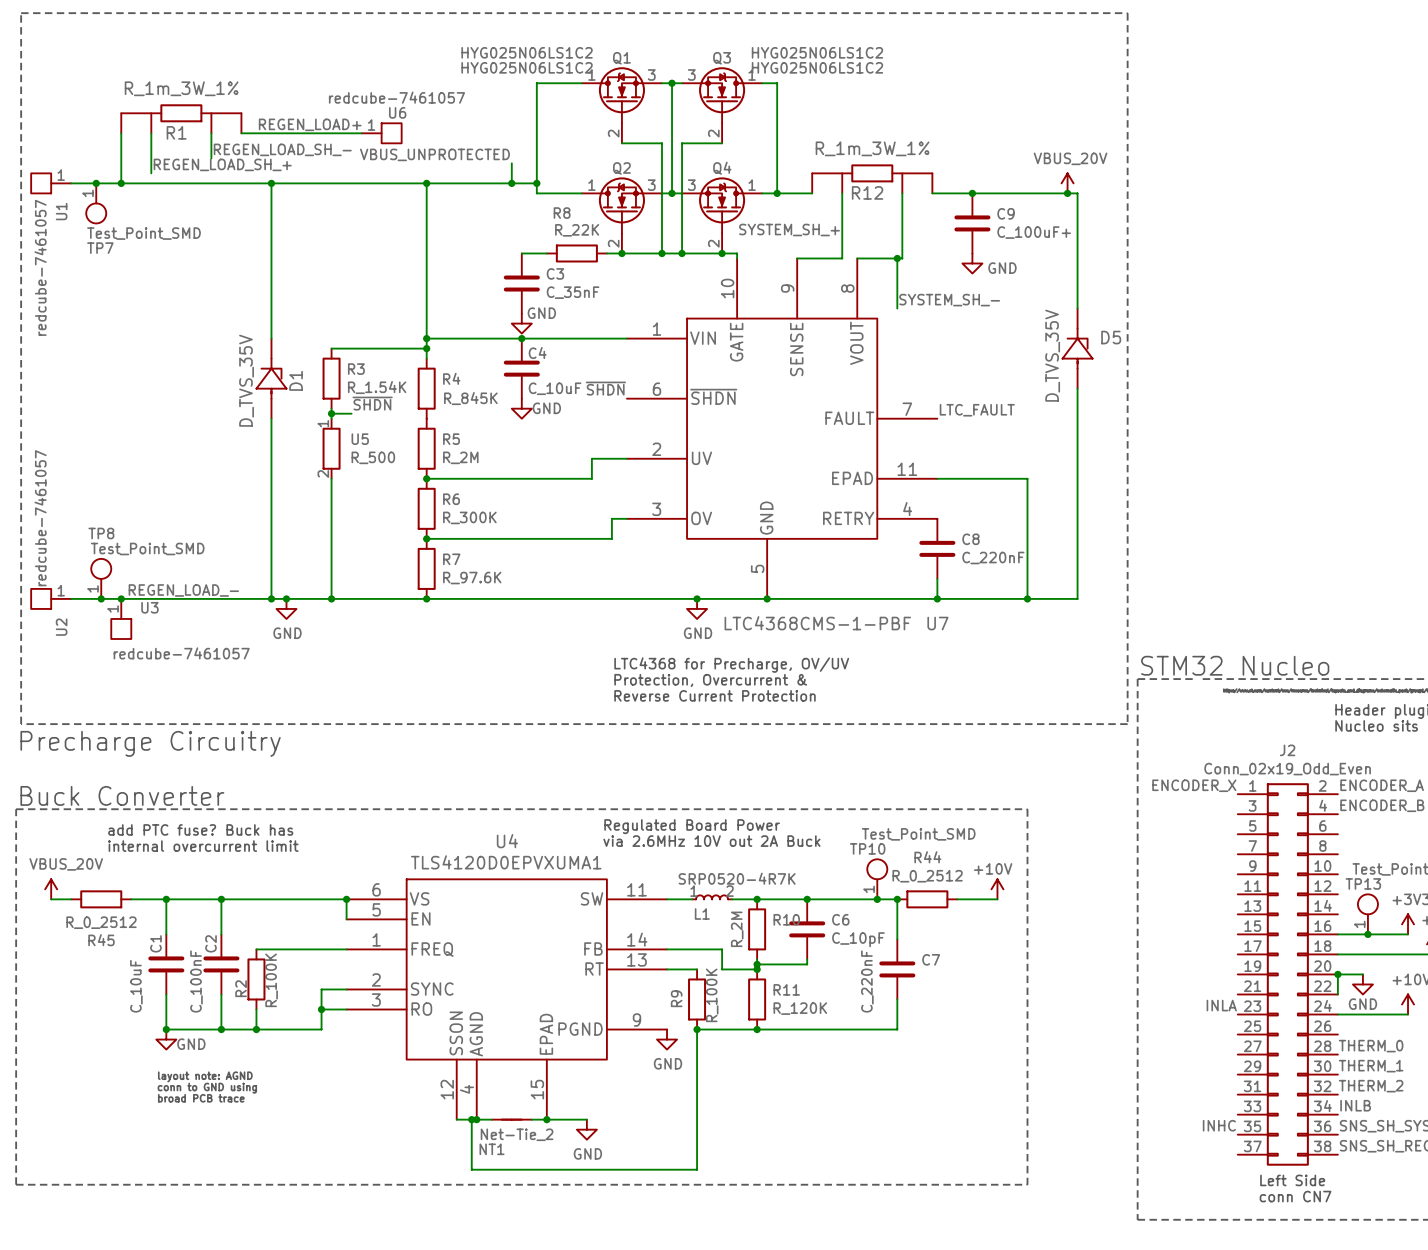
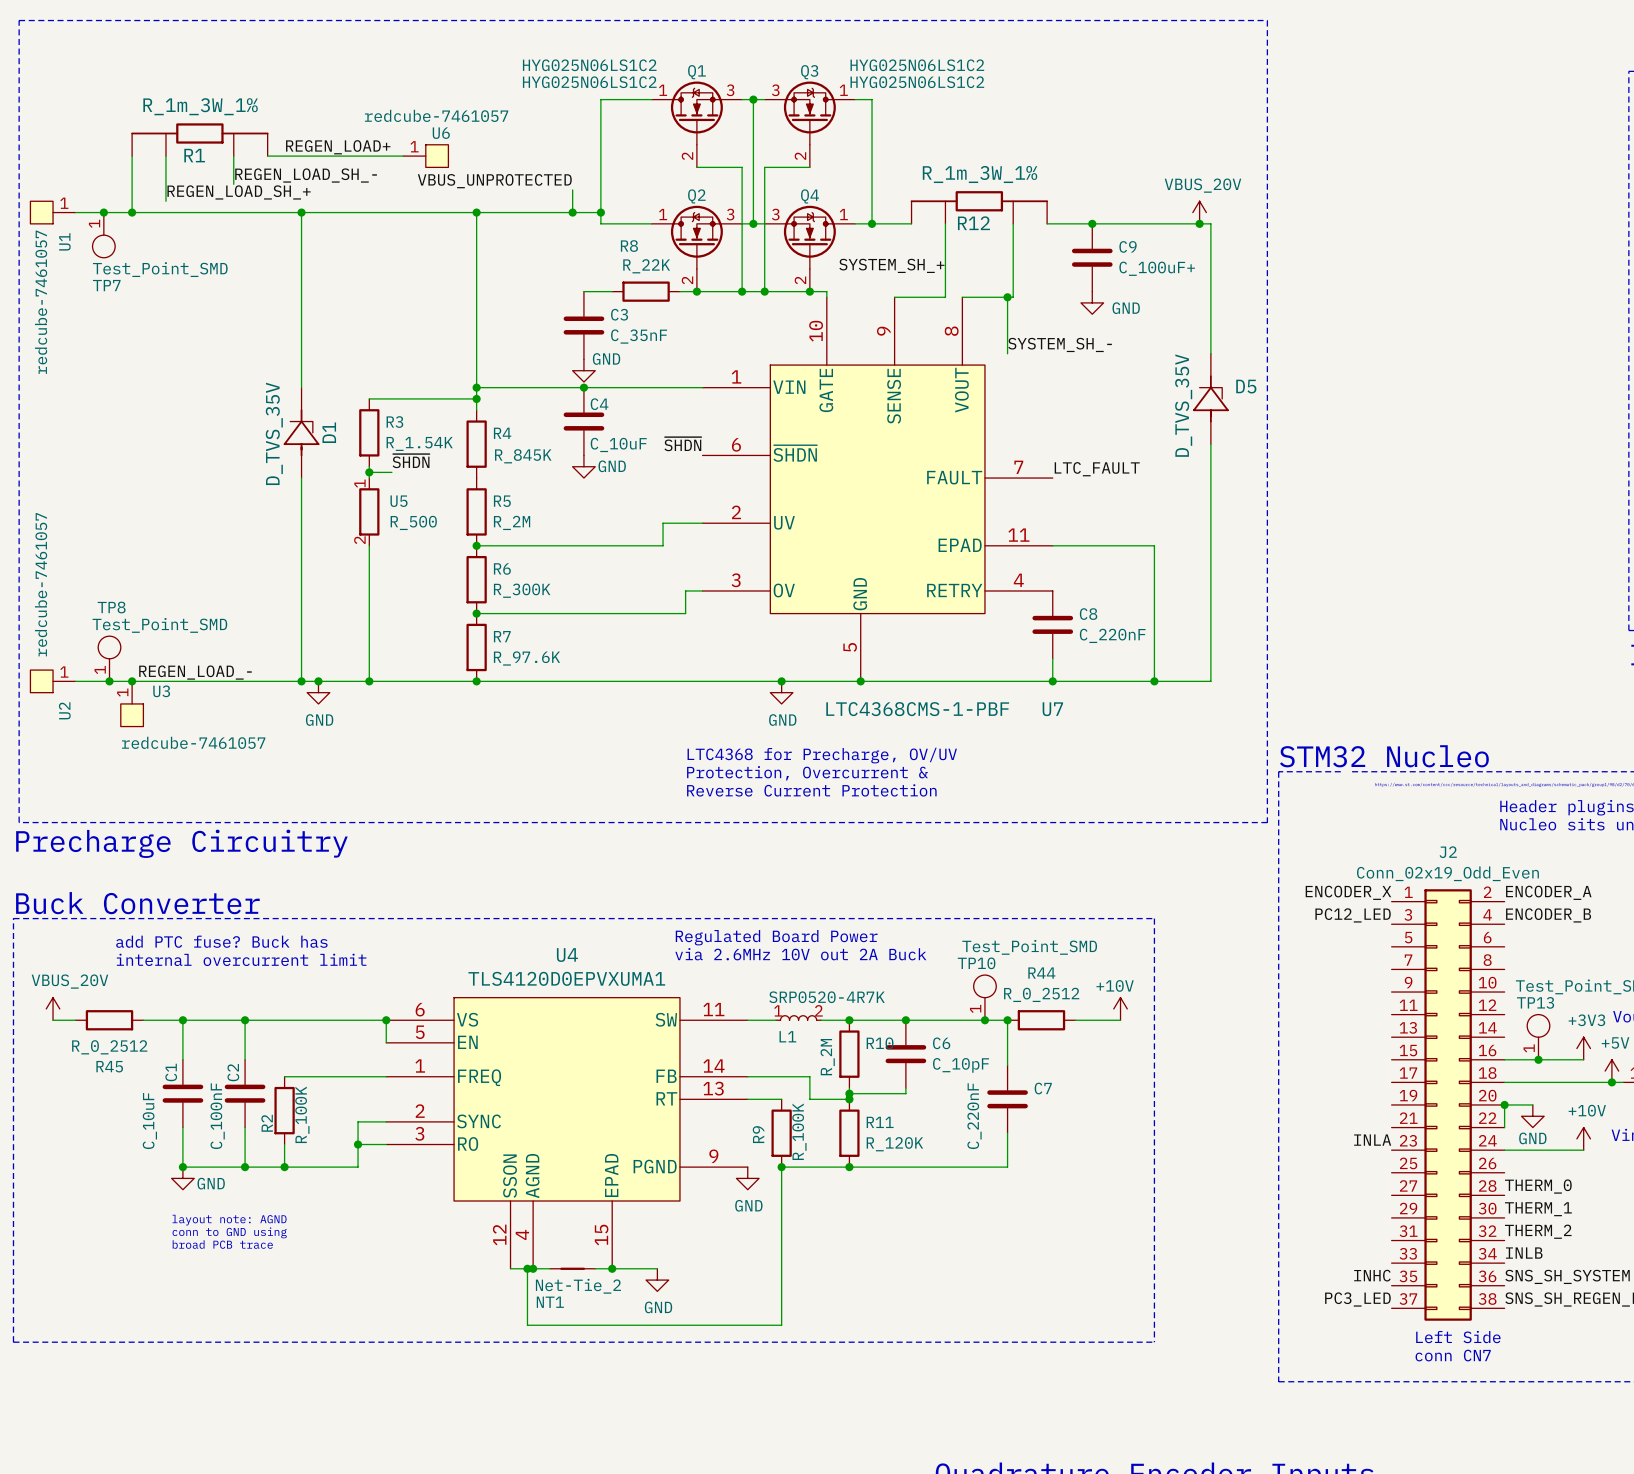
label: none -> PC12_LED (1353, 915)
label: none -> PC3_LED (1357, 1299)

